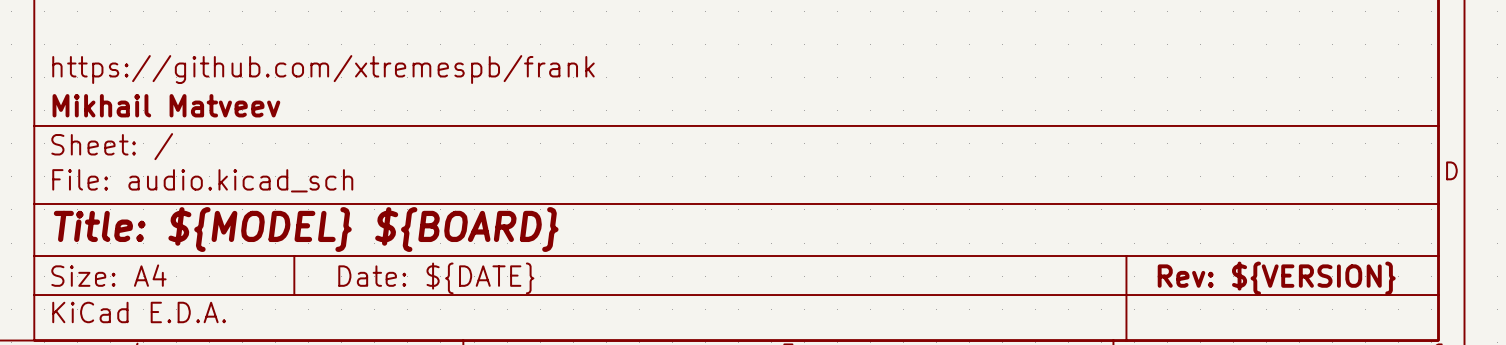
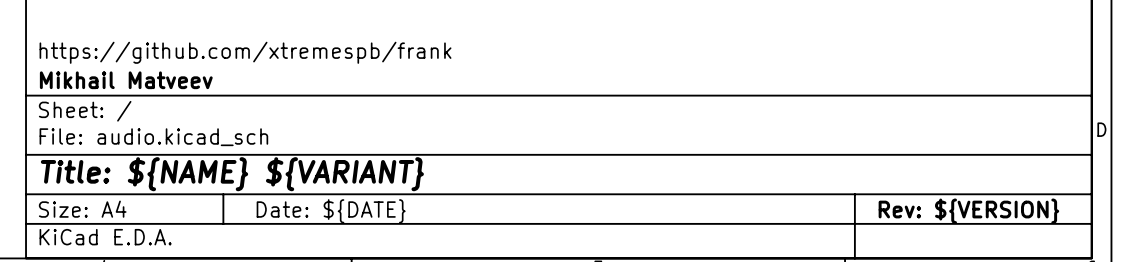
title block: Title: ${MODEL} ${BOARD} (306, 229) -> Title: ${NAME} ${VARIANT} (232, 174)

